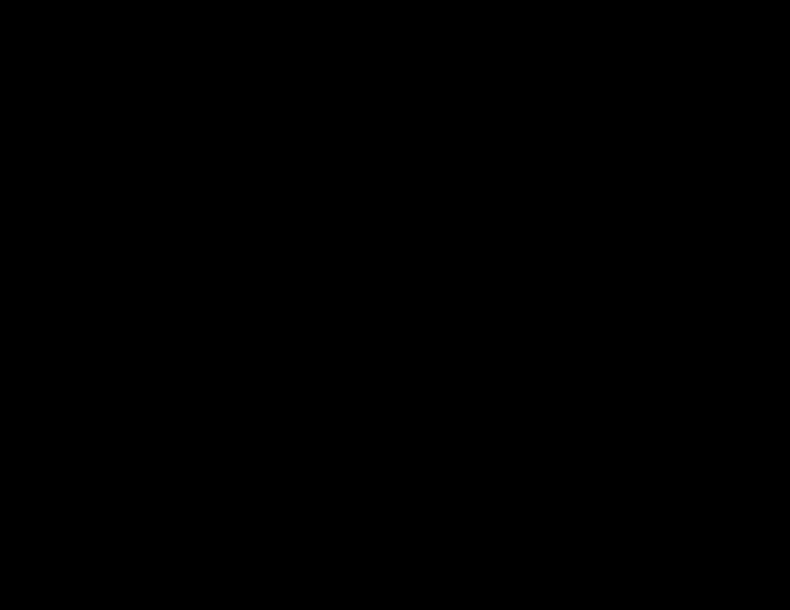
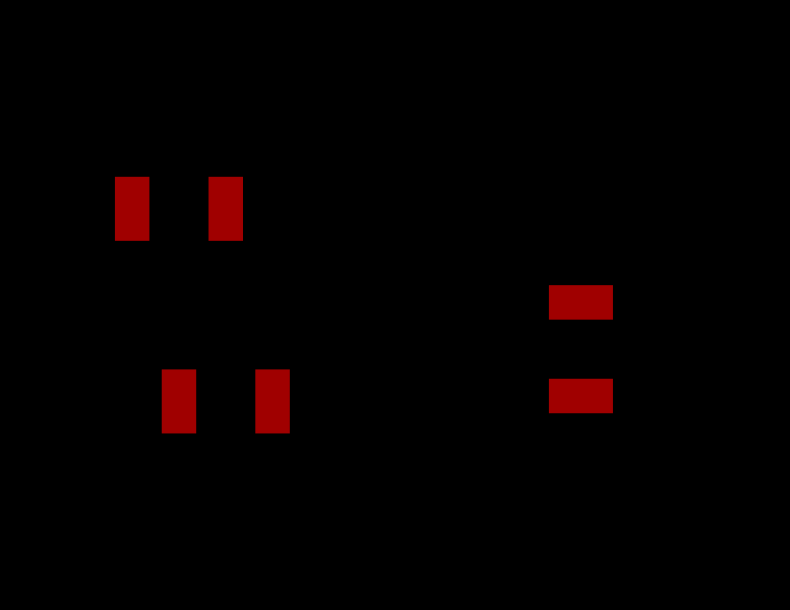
part: none -> (178, 208)
part: none -> (580, 349)
part: none -> (225, 401)

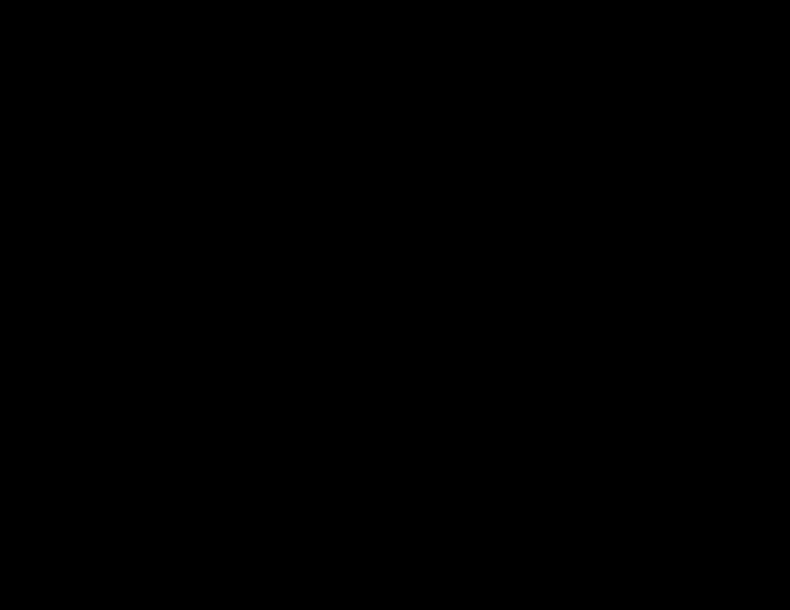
part: (178, 208) -> none
part: (580, 349) -> none
part: (225, 401) -> none

